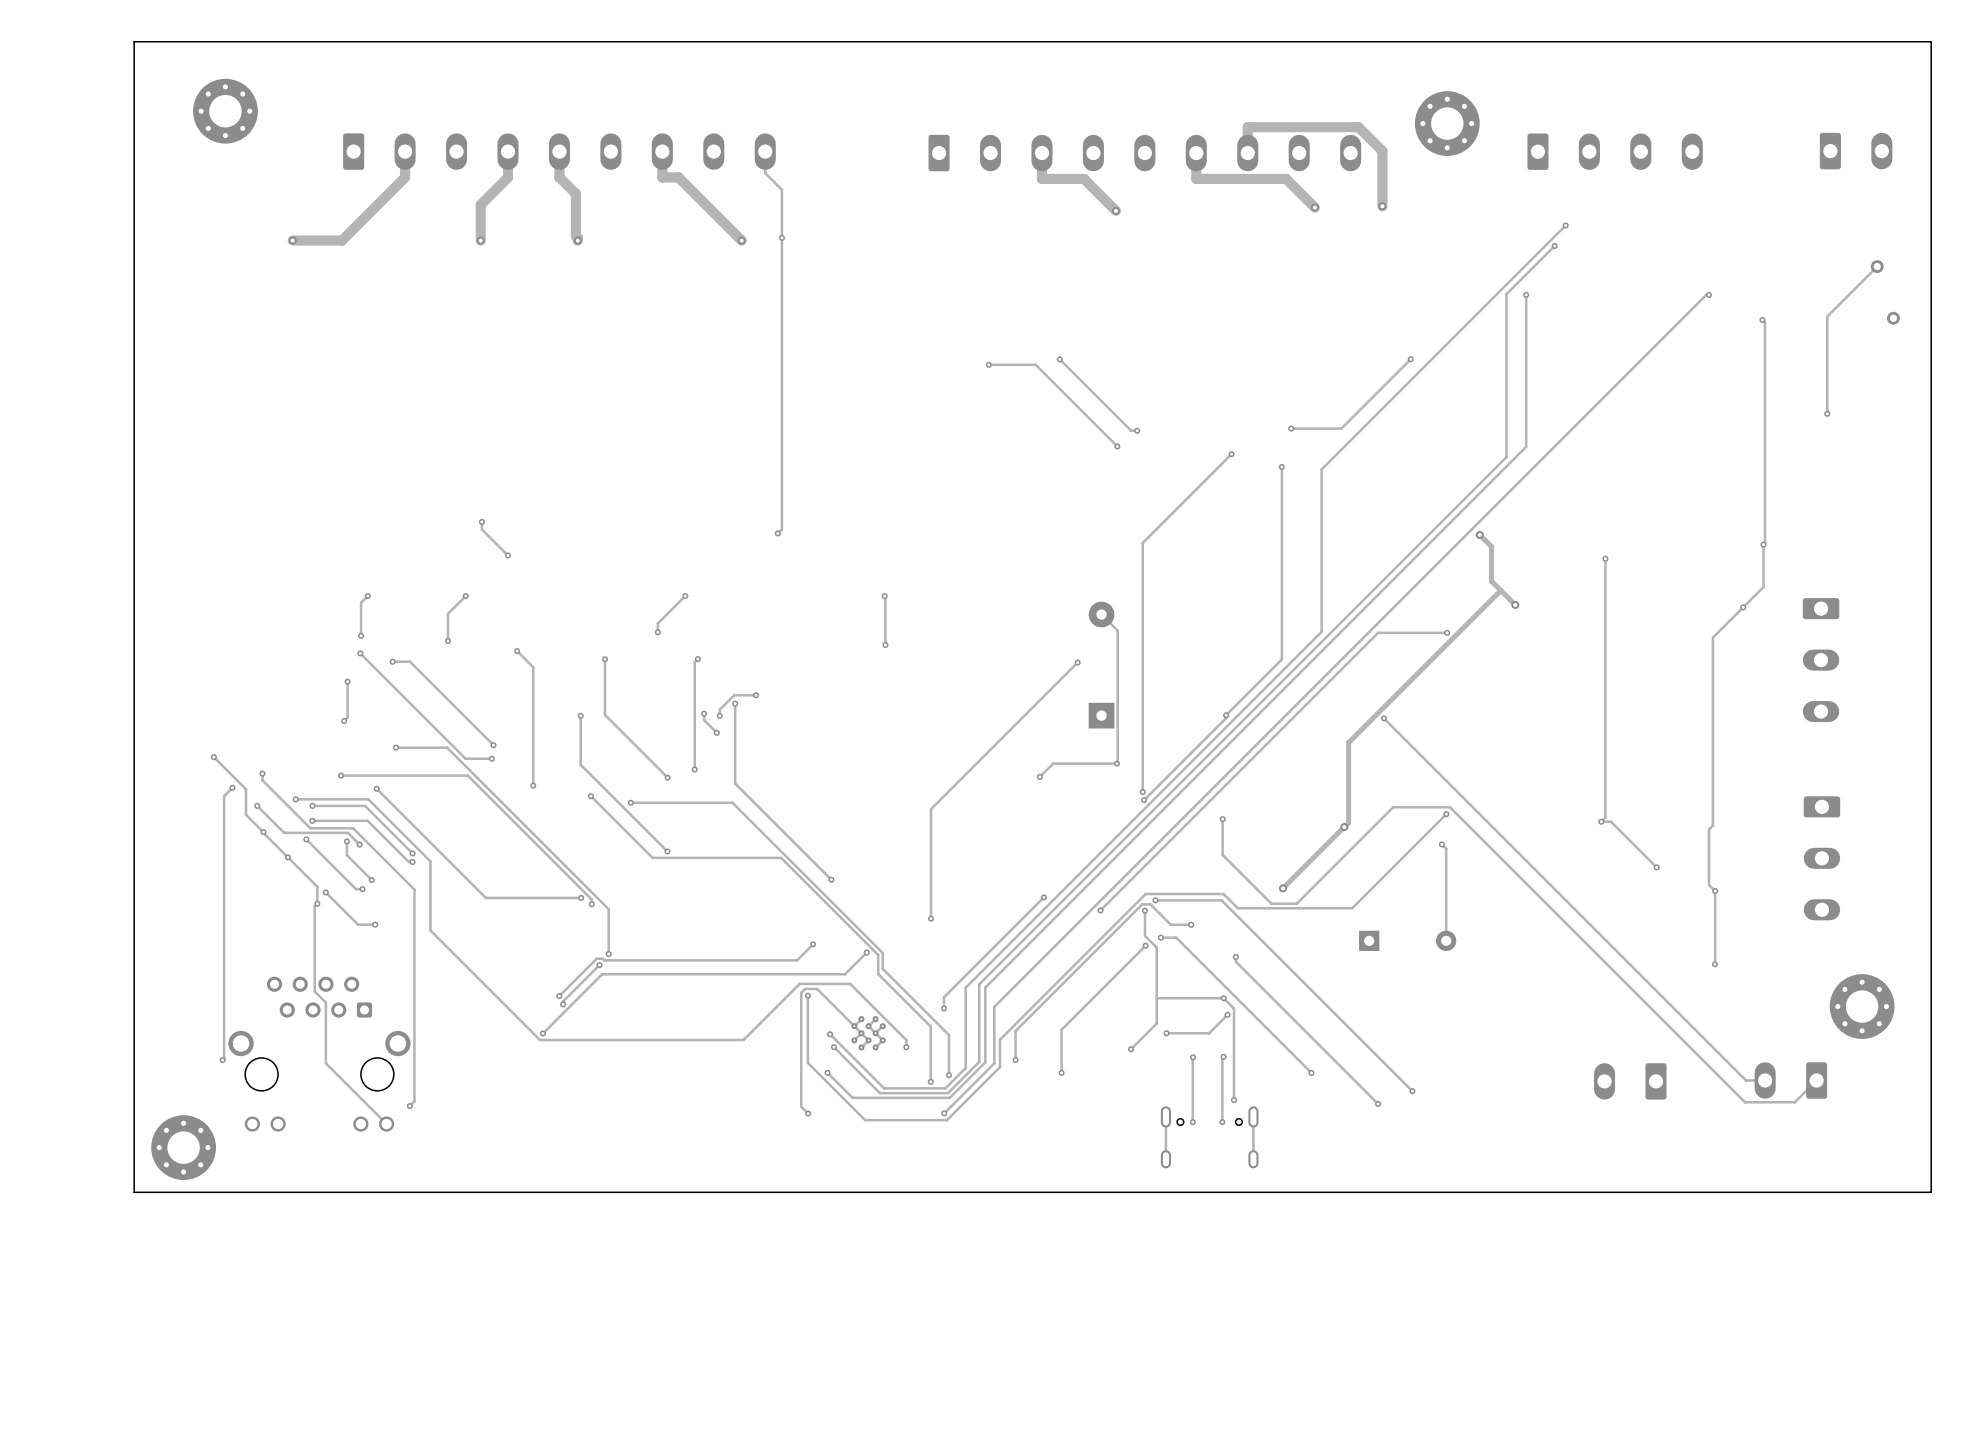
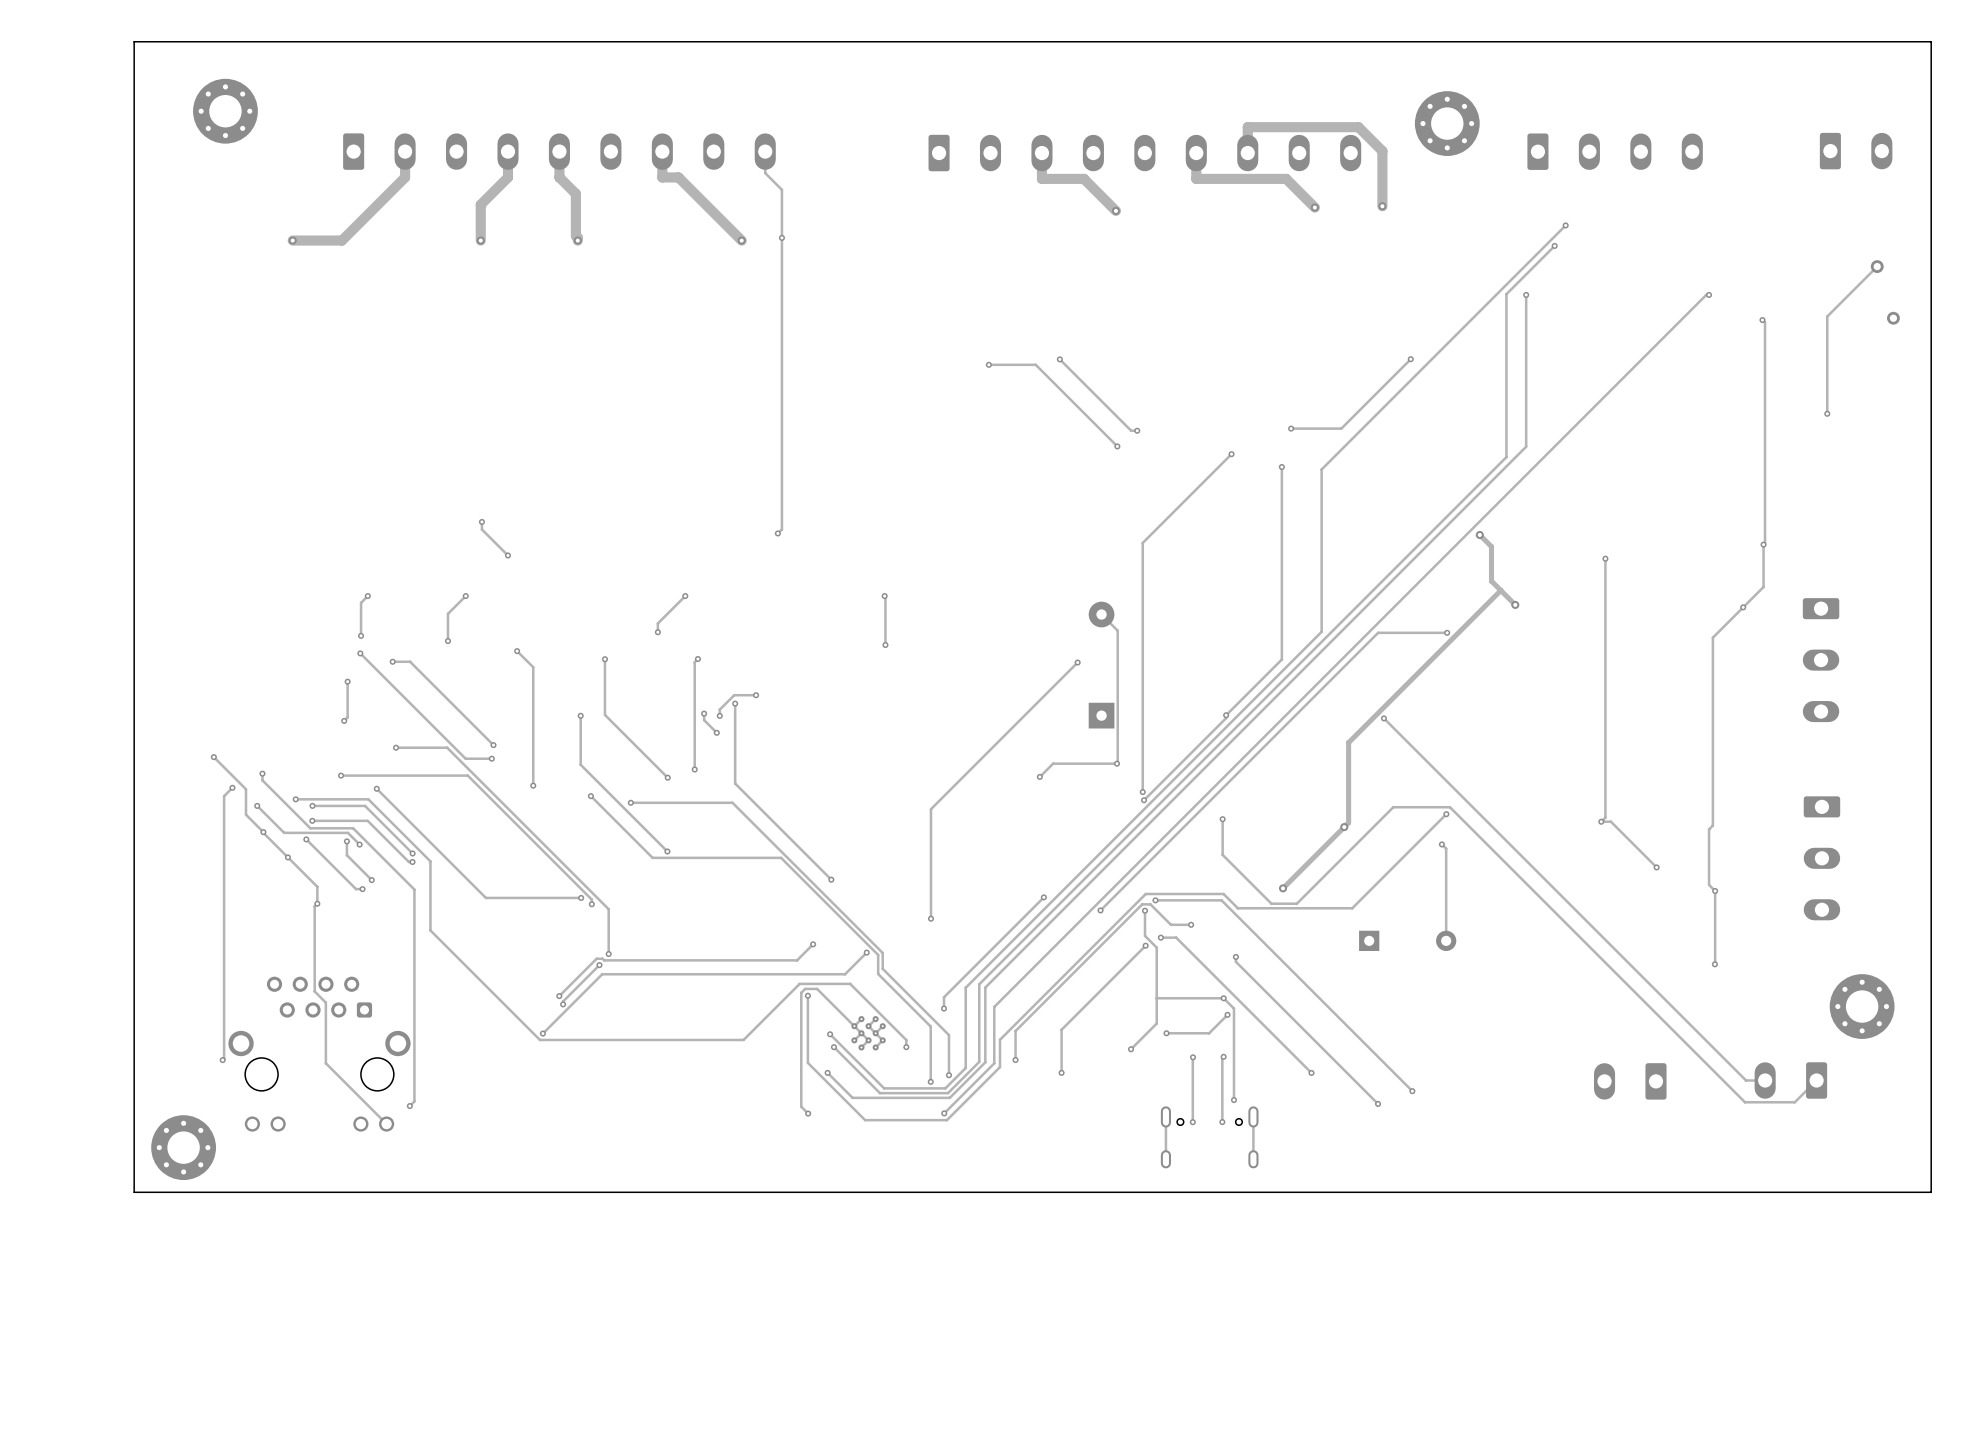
track: (325, 892) (358, 924) (375, 924) -> none
via: (325, 892) -> none
via: (375, 924) -> none

